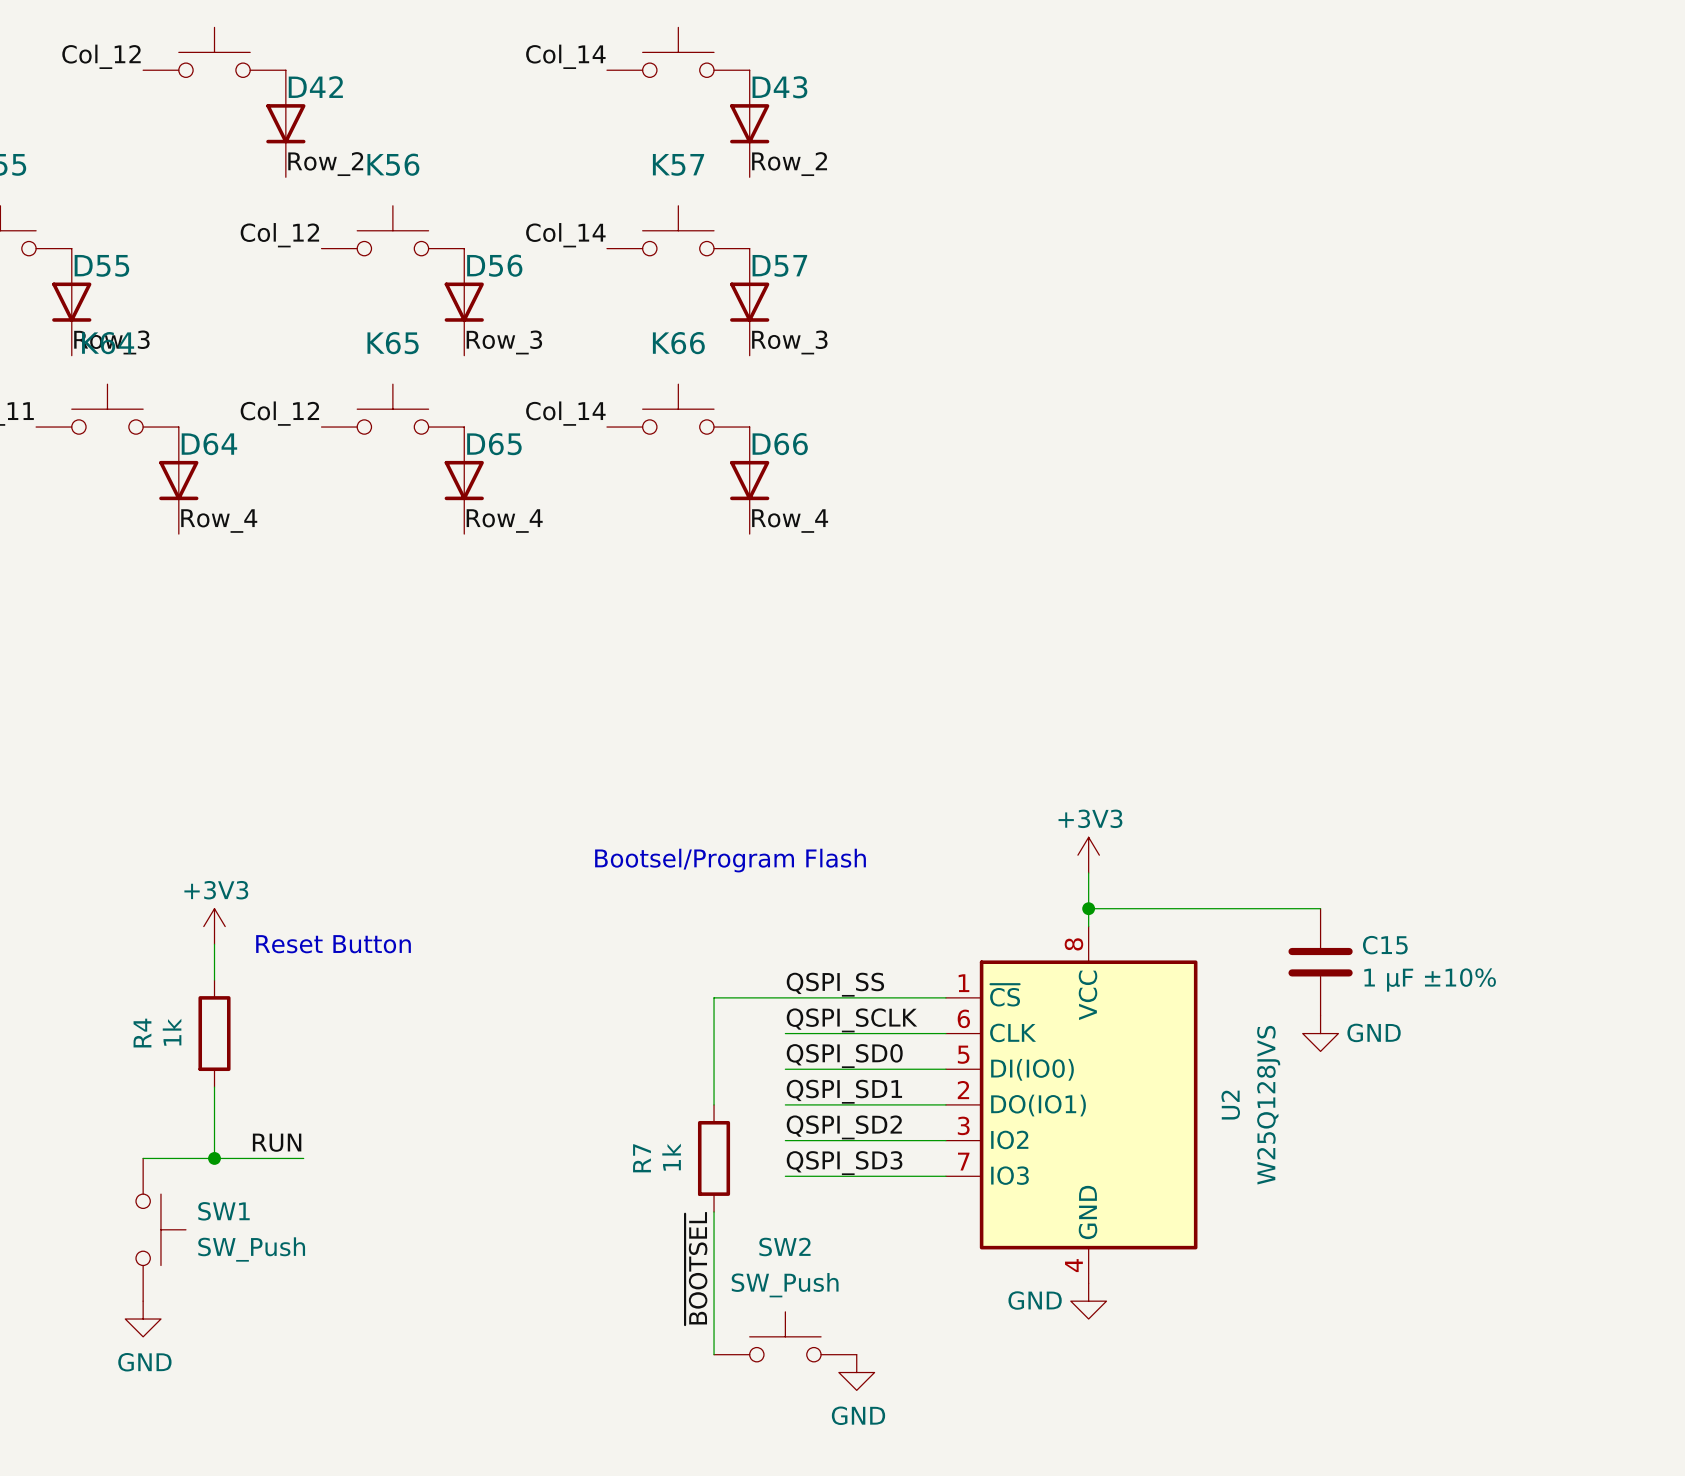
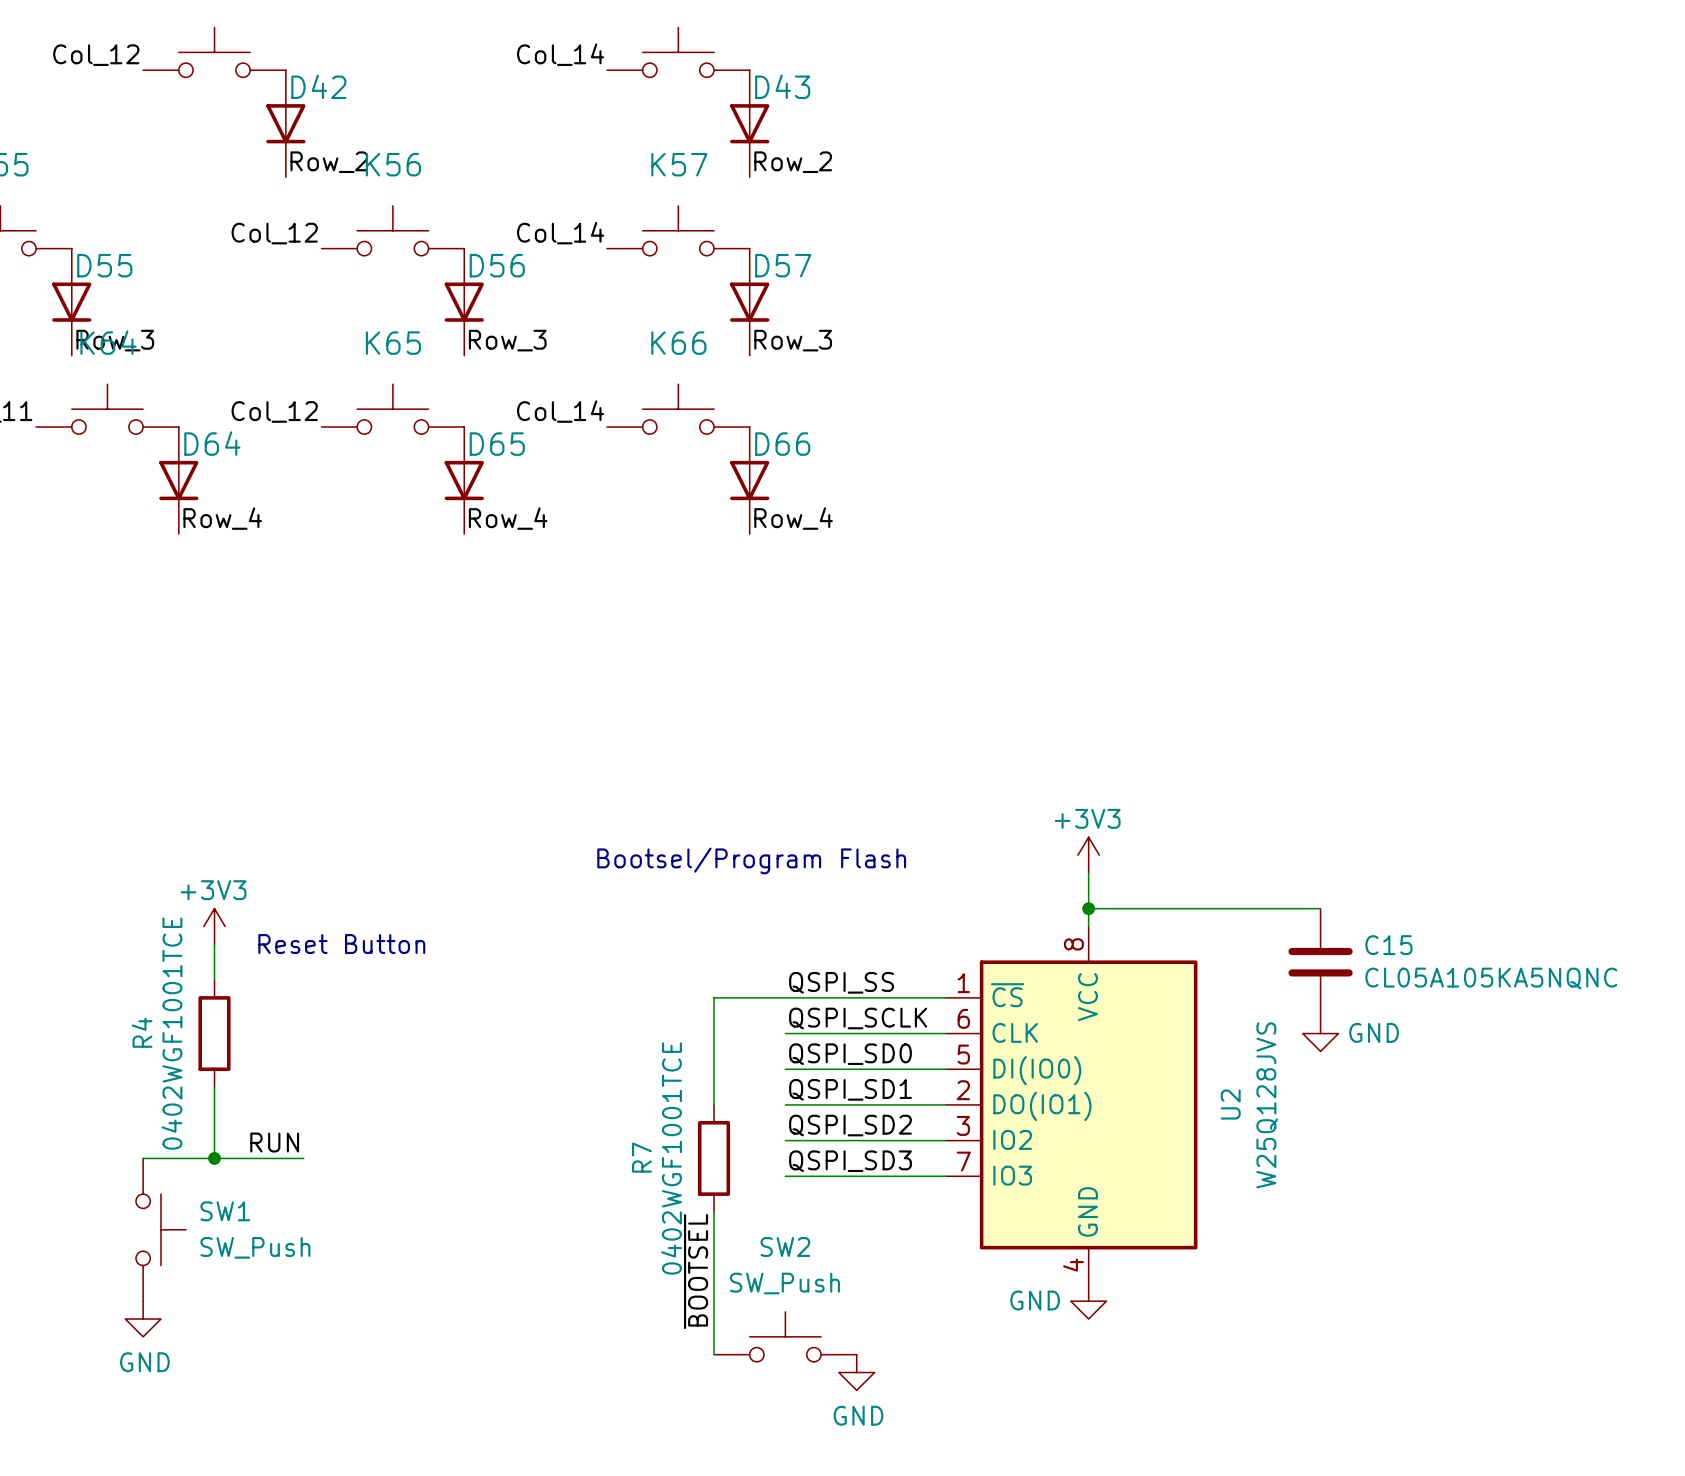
C15 value: 1 µF ±10% (1430, 979) -> CL05A105KA5NQNC (1491, 978)
R4 value: 1k (172, 1032) -> 0402WGF1001TCE (172, 1033)
R7 value: 1k (671, 1157) -> 0402WGF1001TCE (671, 1158)

